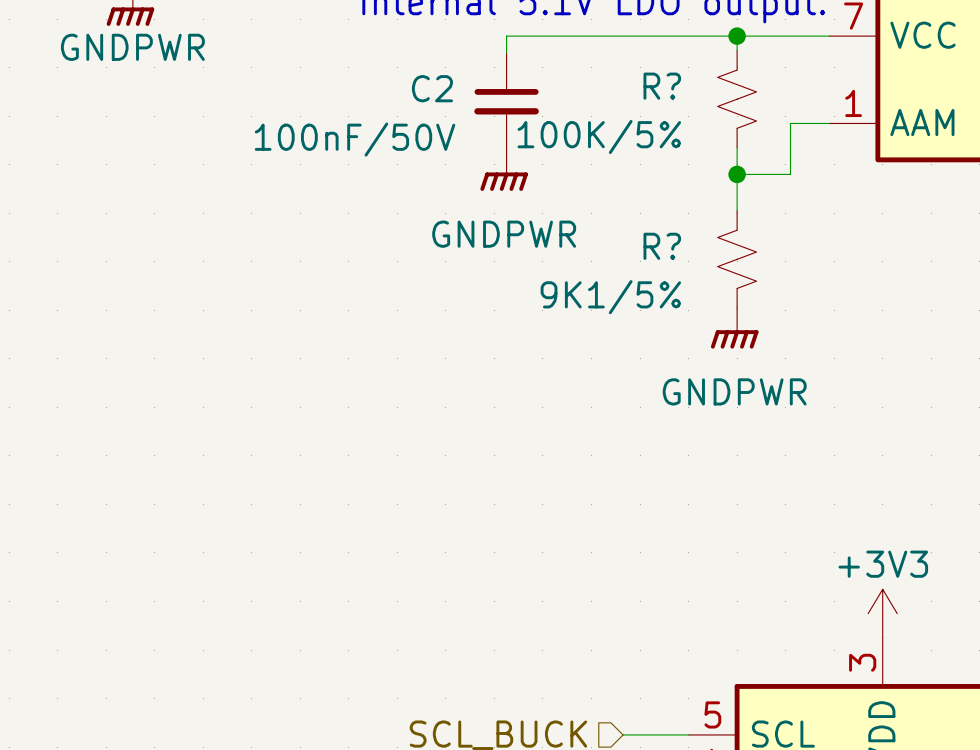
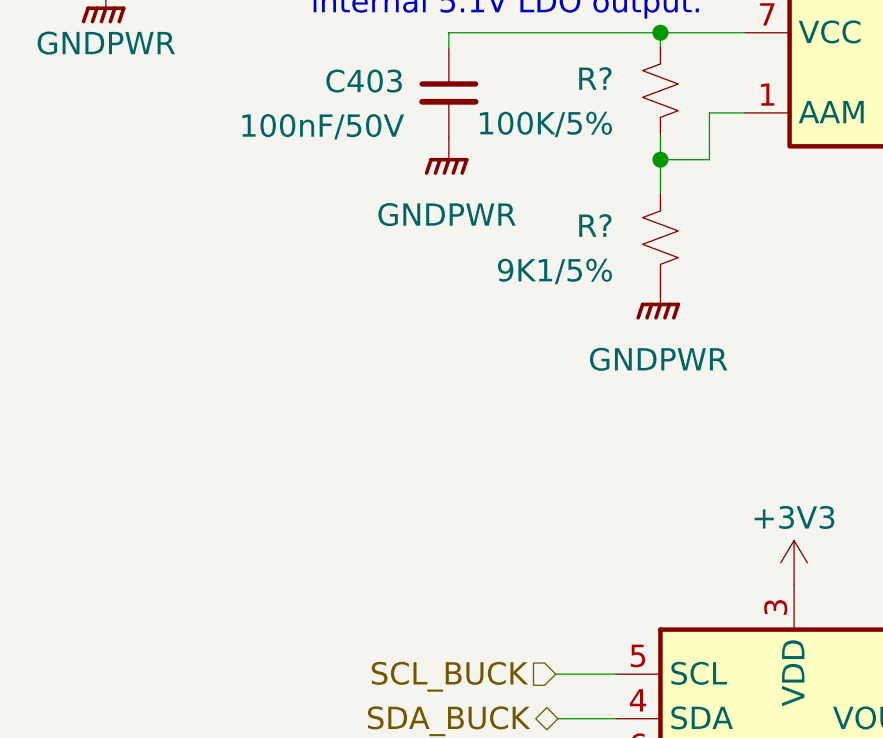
C2 name: C2 (432, 88) -> C403 (364, 81)

